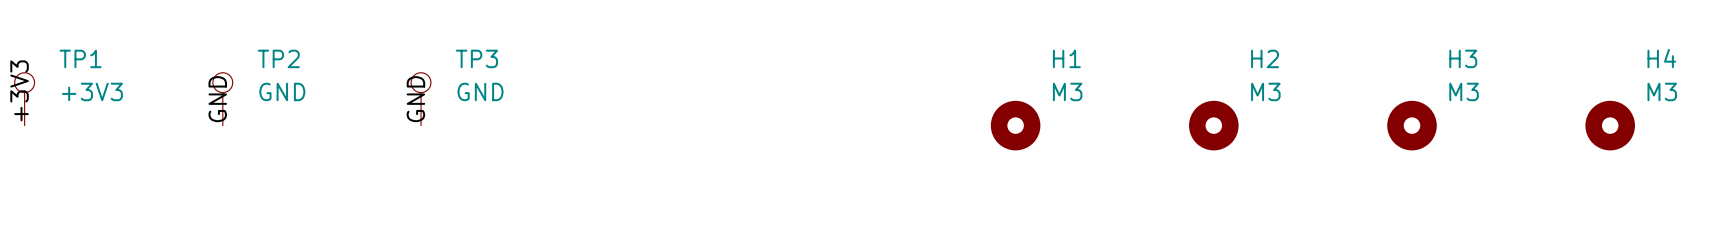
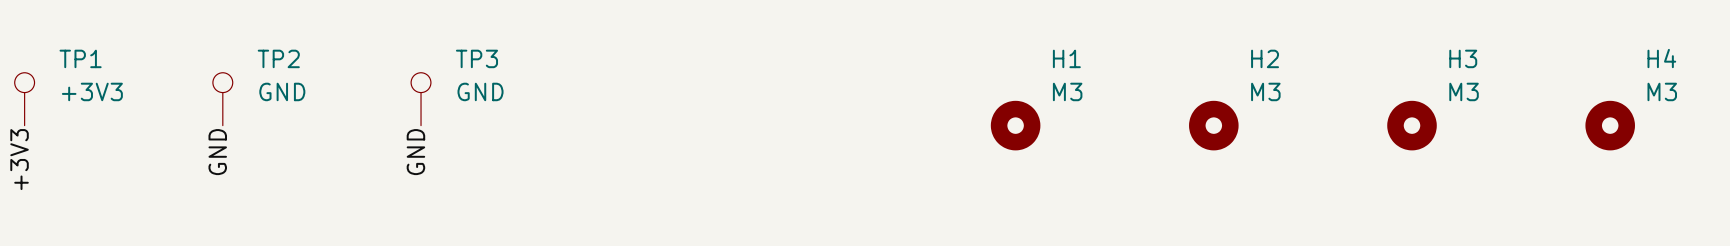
label position: +3V3 (19, 90) -> +3V3 (19, 159)
label position: GND (217, 99) -> GND (217, 152)
label position: GND (415, 99) -> GND (415, 152)

